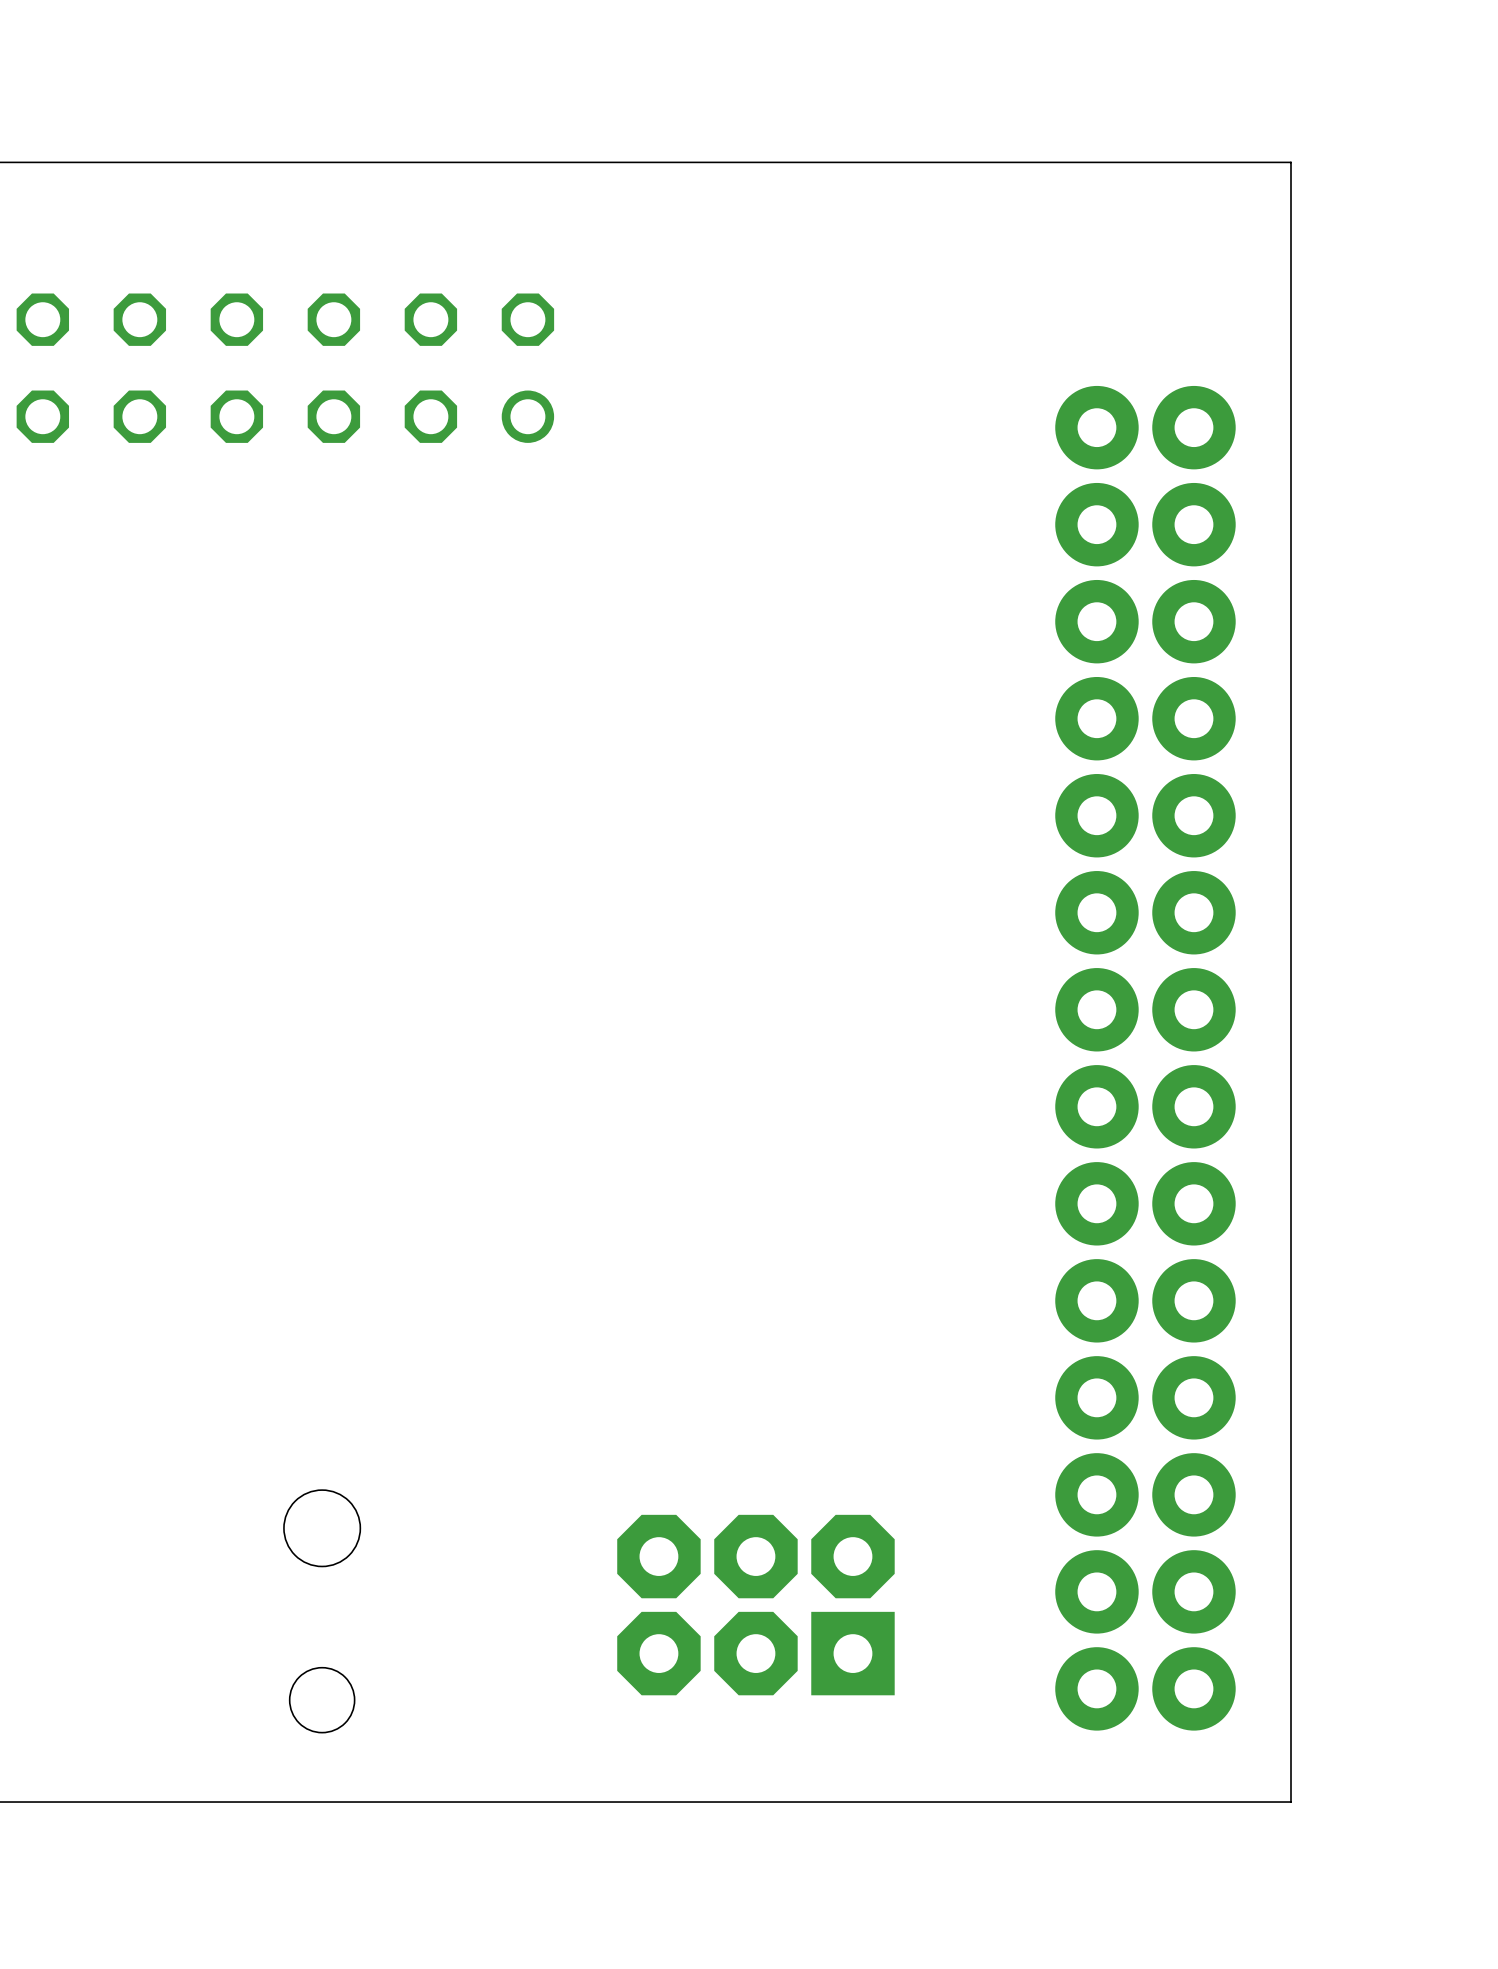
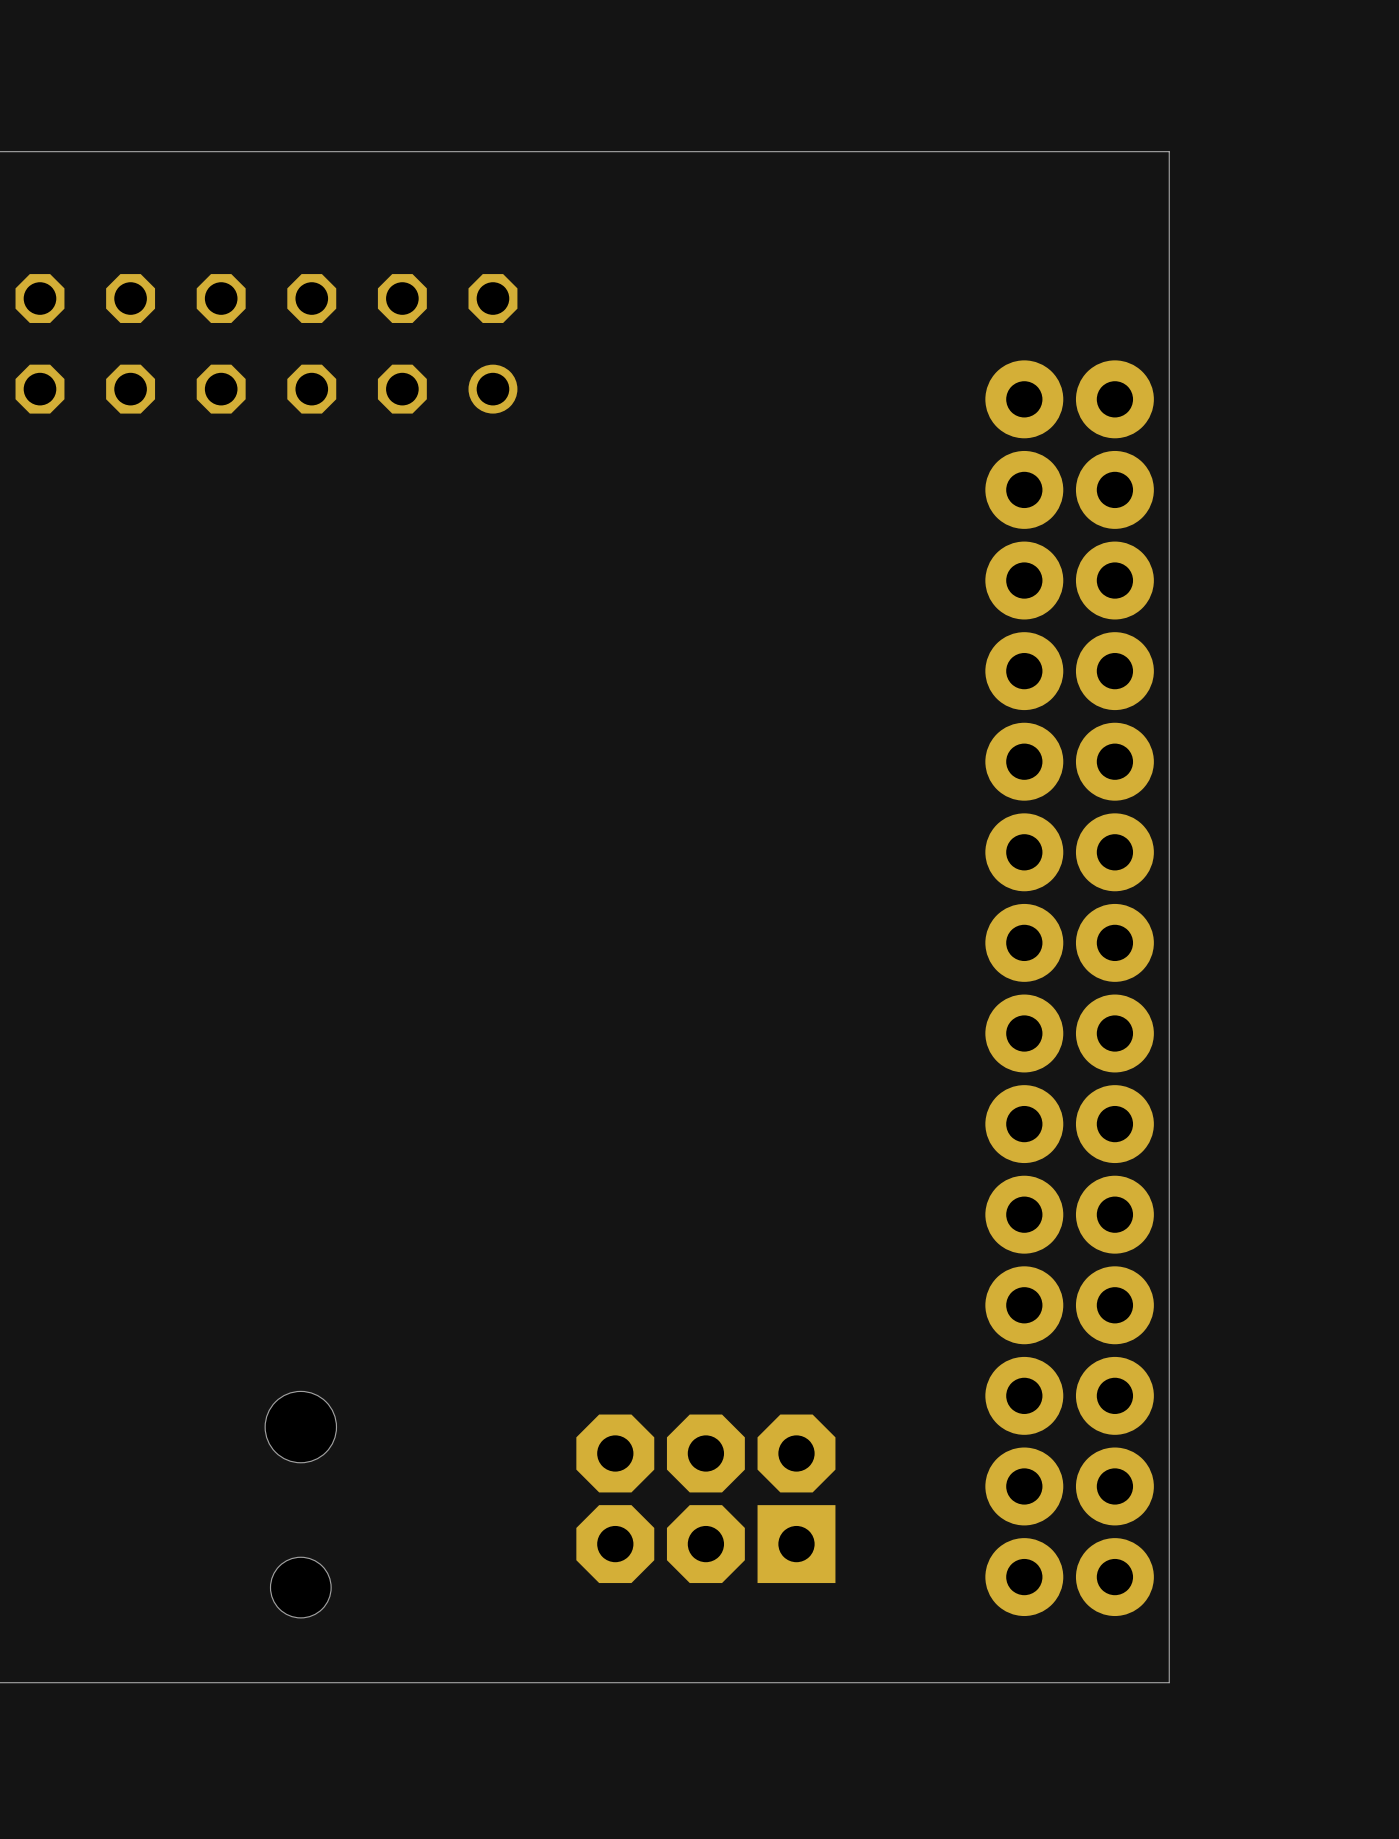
board edge: (1252, 162) (1291, 162) (1291, 1802) (1252, 1802) -> (1169, 151) (1169, 1682)

